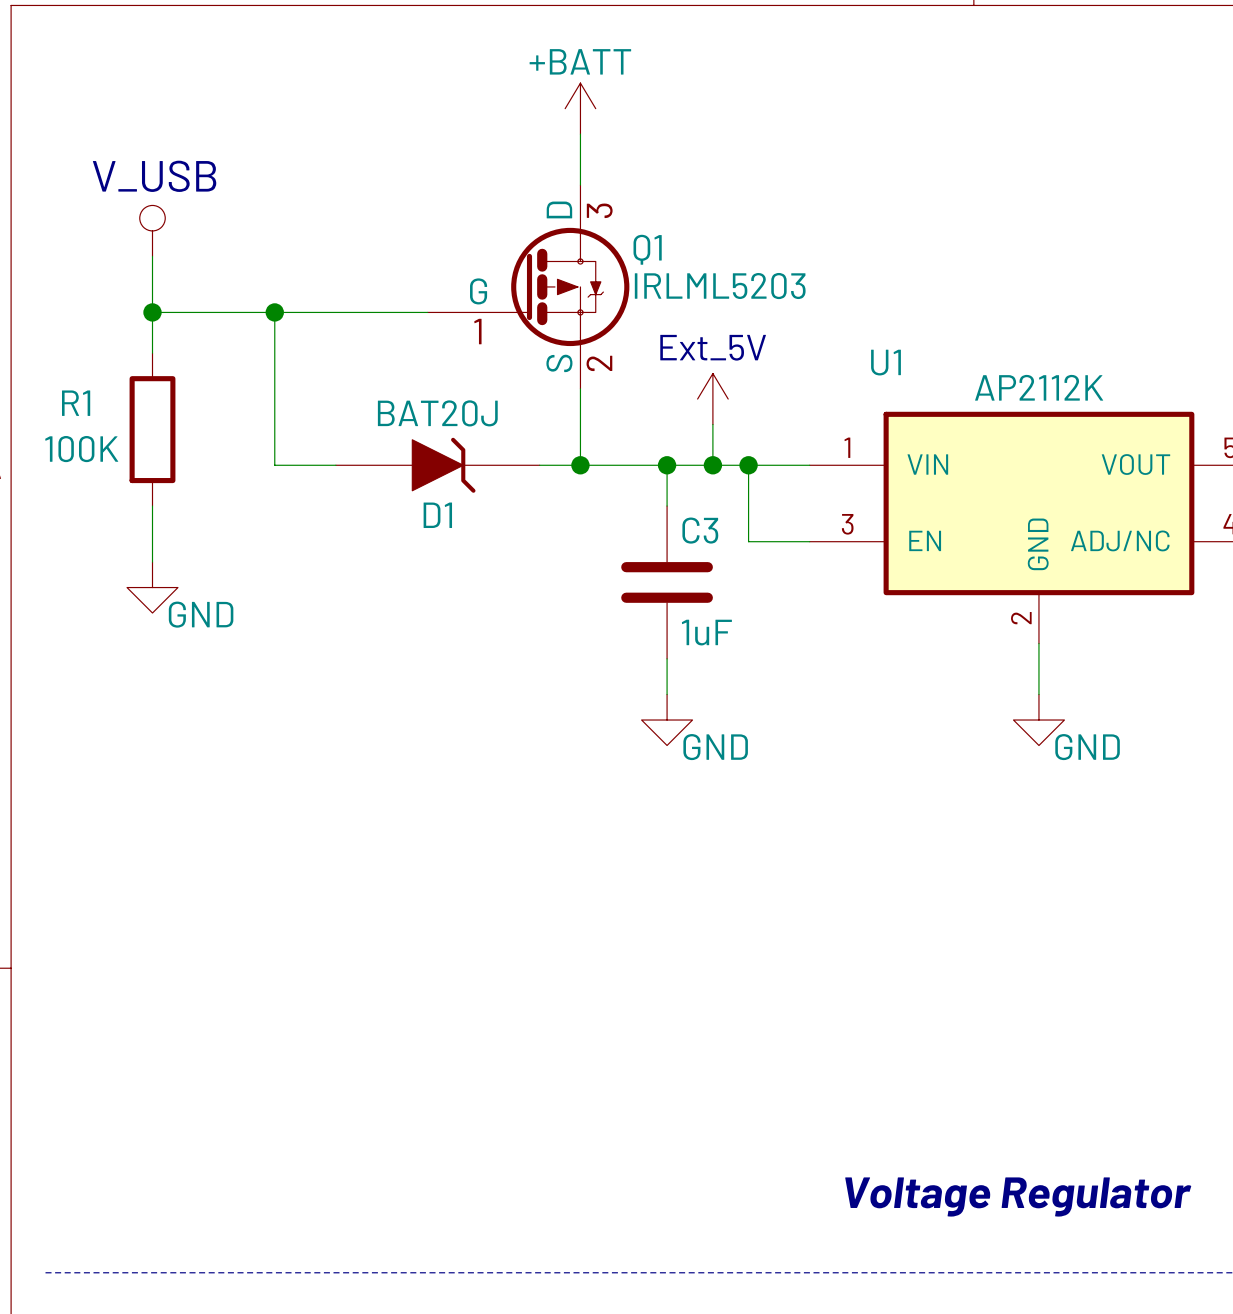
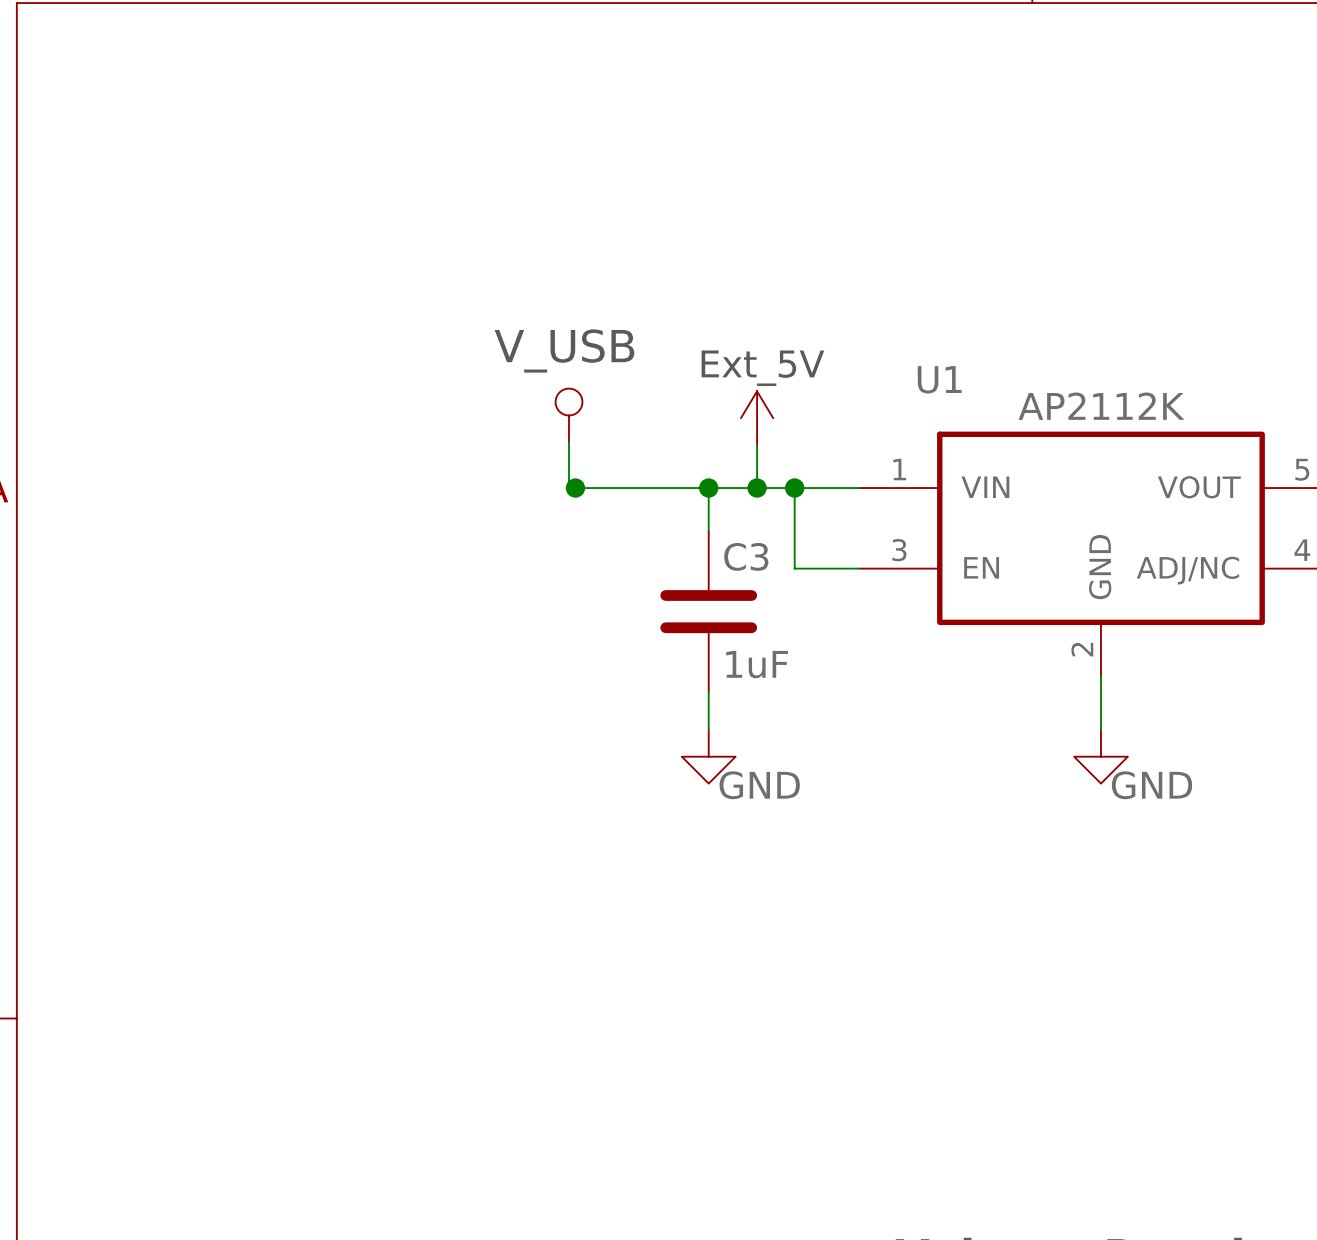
power symbol: +BATT (580, 108) -> none
wire: (580, 134) (580, 185) -> none
text position: V_USB (154, 176) -> V_USB (564, 350)
power symbol position: (152, 230) -> (569, 415)
wire: (152, 256) (152, 353) -> none
Q1: IRLML5203 (528, 286) -> none
wire: (152, 312) (427, 312) -> none
junction: (152, 312) -> none
wire: (274, 312) (274, 465) (335, 465) -> none
junction: (274, 312) -> none
wire: (580, 388) (580, 465) -> none
wire: none -> (569, 442) (569, 488) (574, 488)
R1: 100K (152, 429) -> none
D1: BAT20J (437, 465) -> none
junction position: (580, 465) -> (575, 488)
wire: (152, 506) (152, 562) -> none
power symbol: GND (152, 587) -> none

